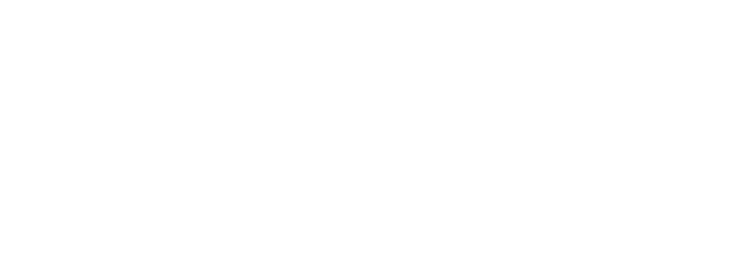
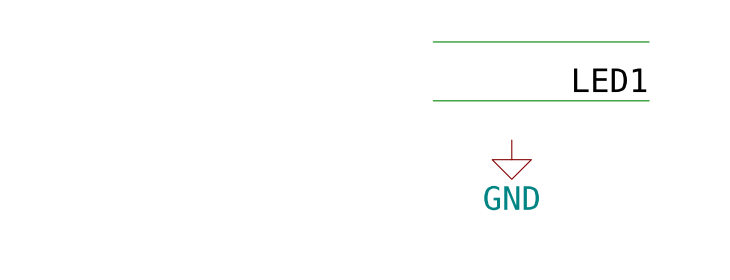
wire: none -> (433, 41) (649, 41)
label: none -> LED1 (610, 80)
wire: none -> (433, 100) (649, 100)
power symbol: none -> GND (511, 159)

